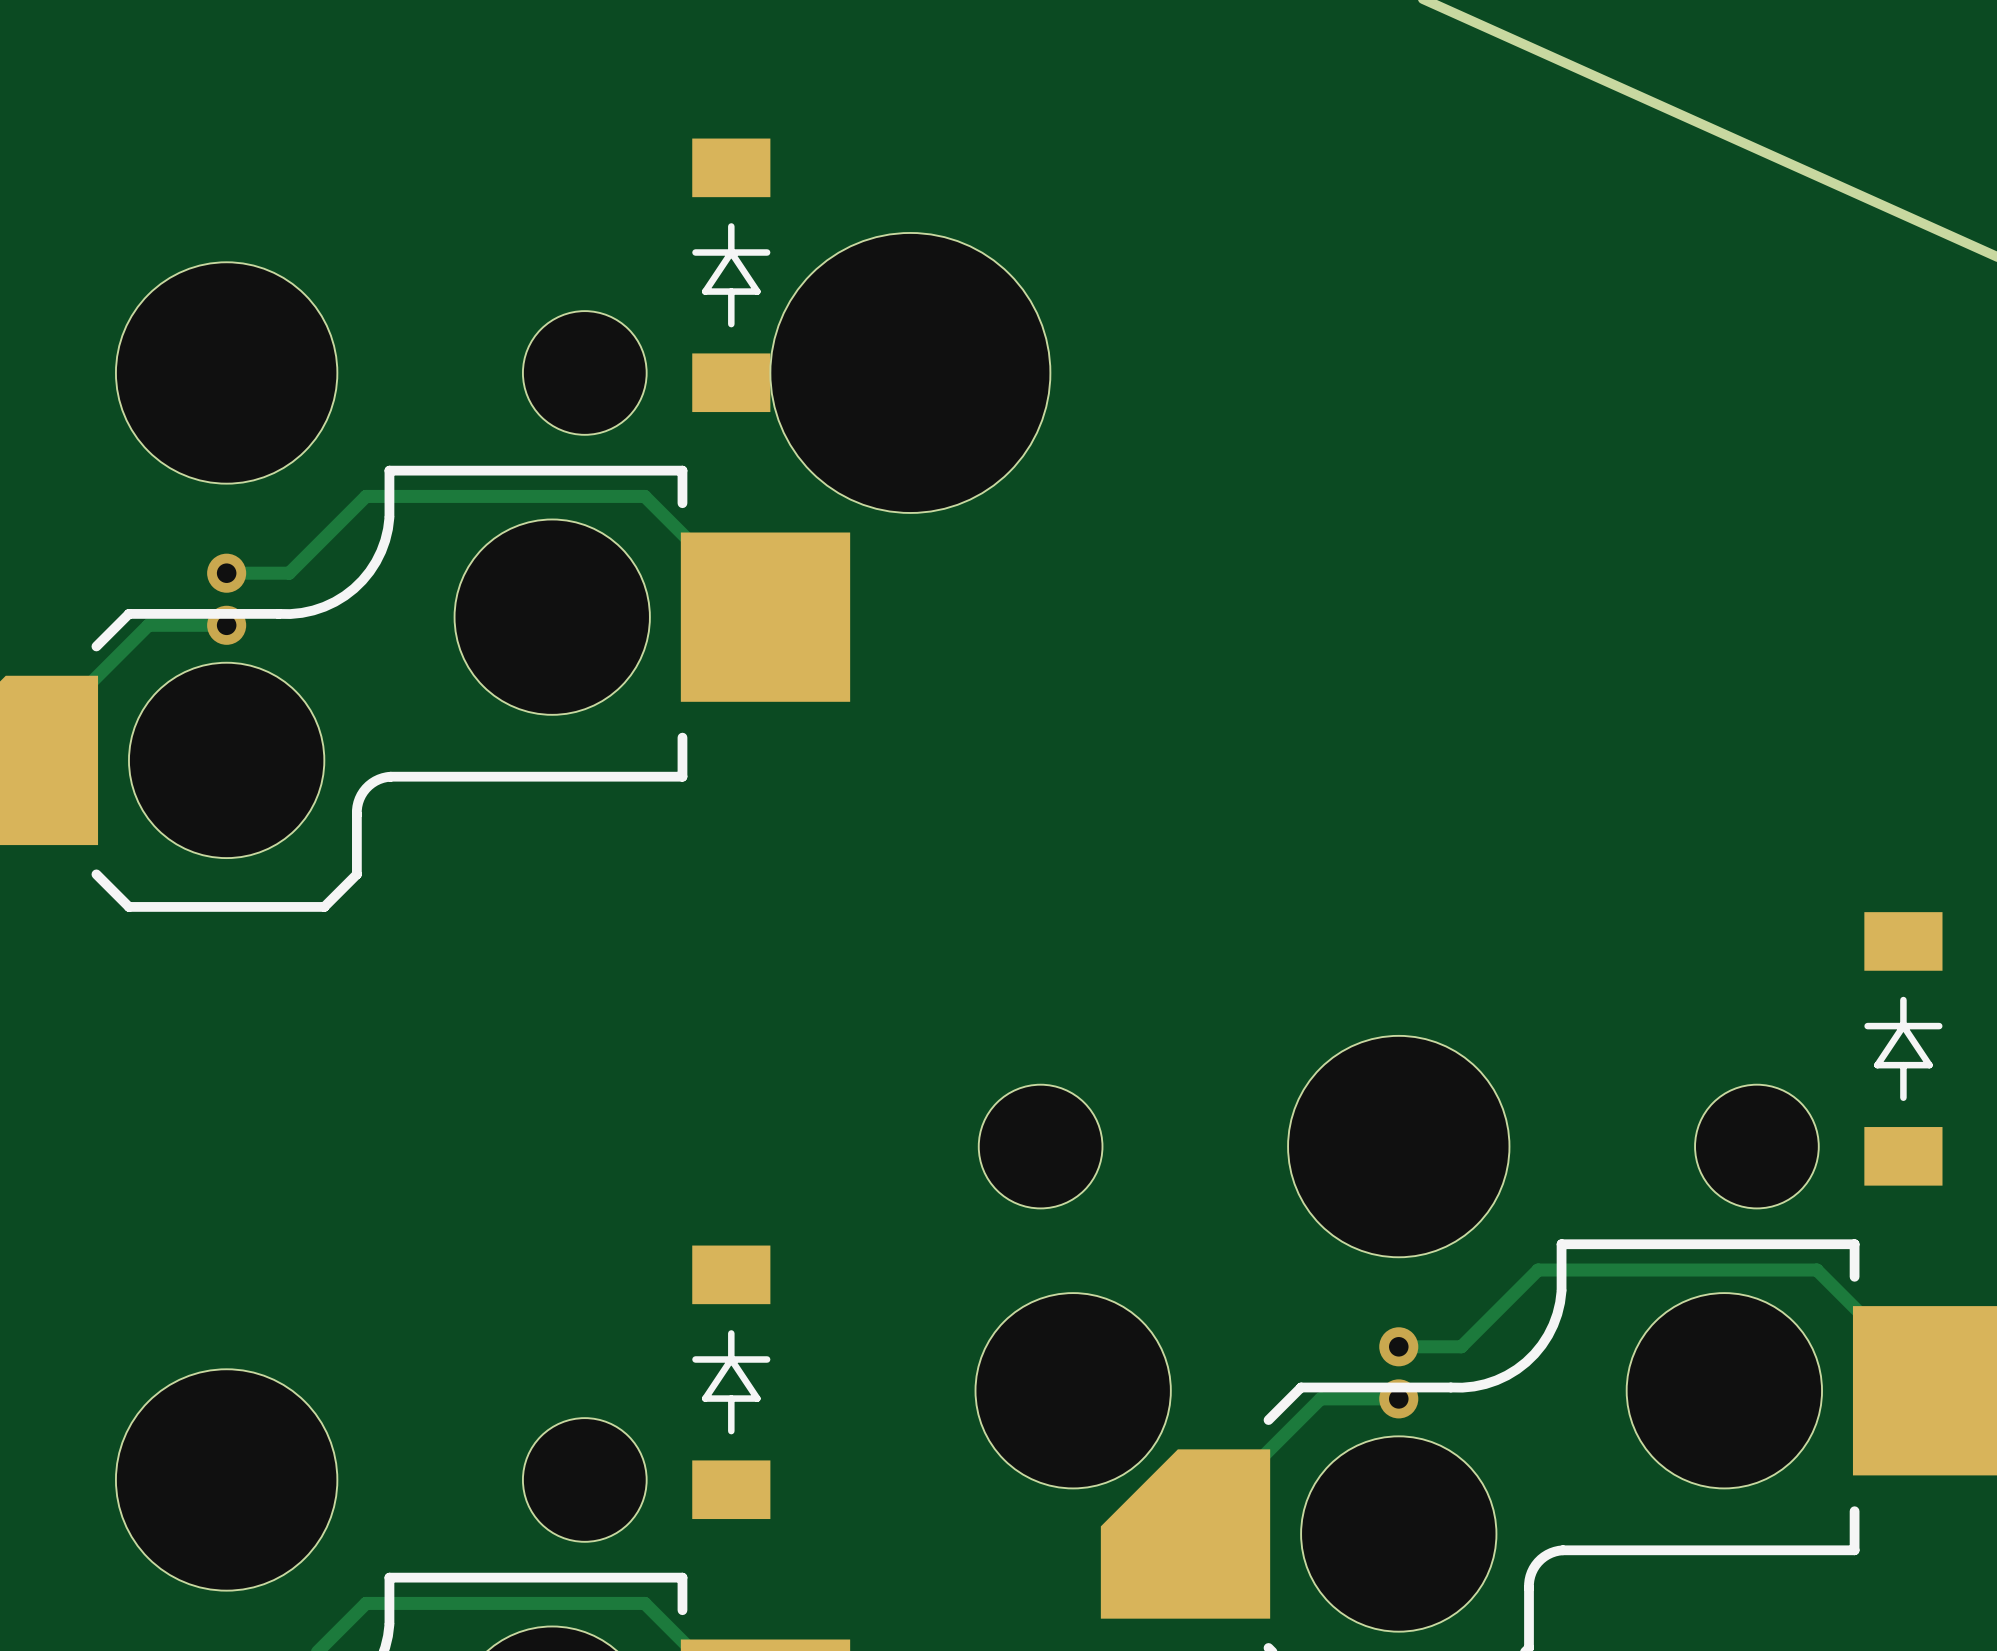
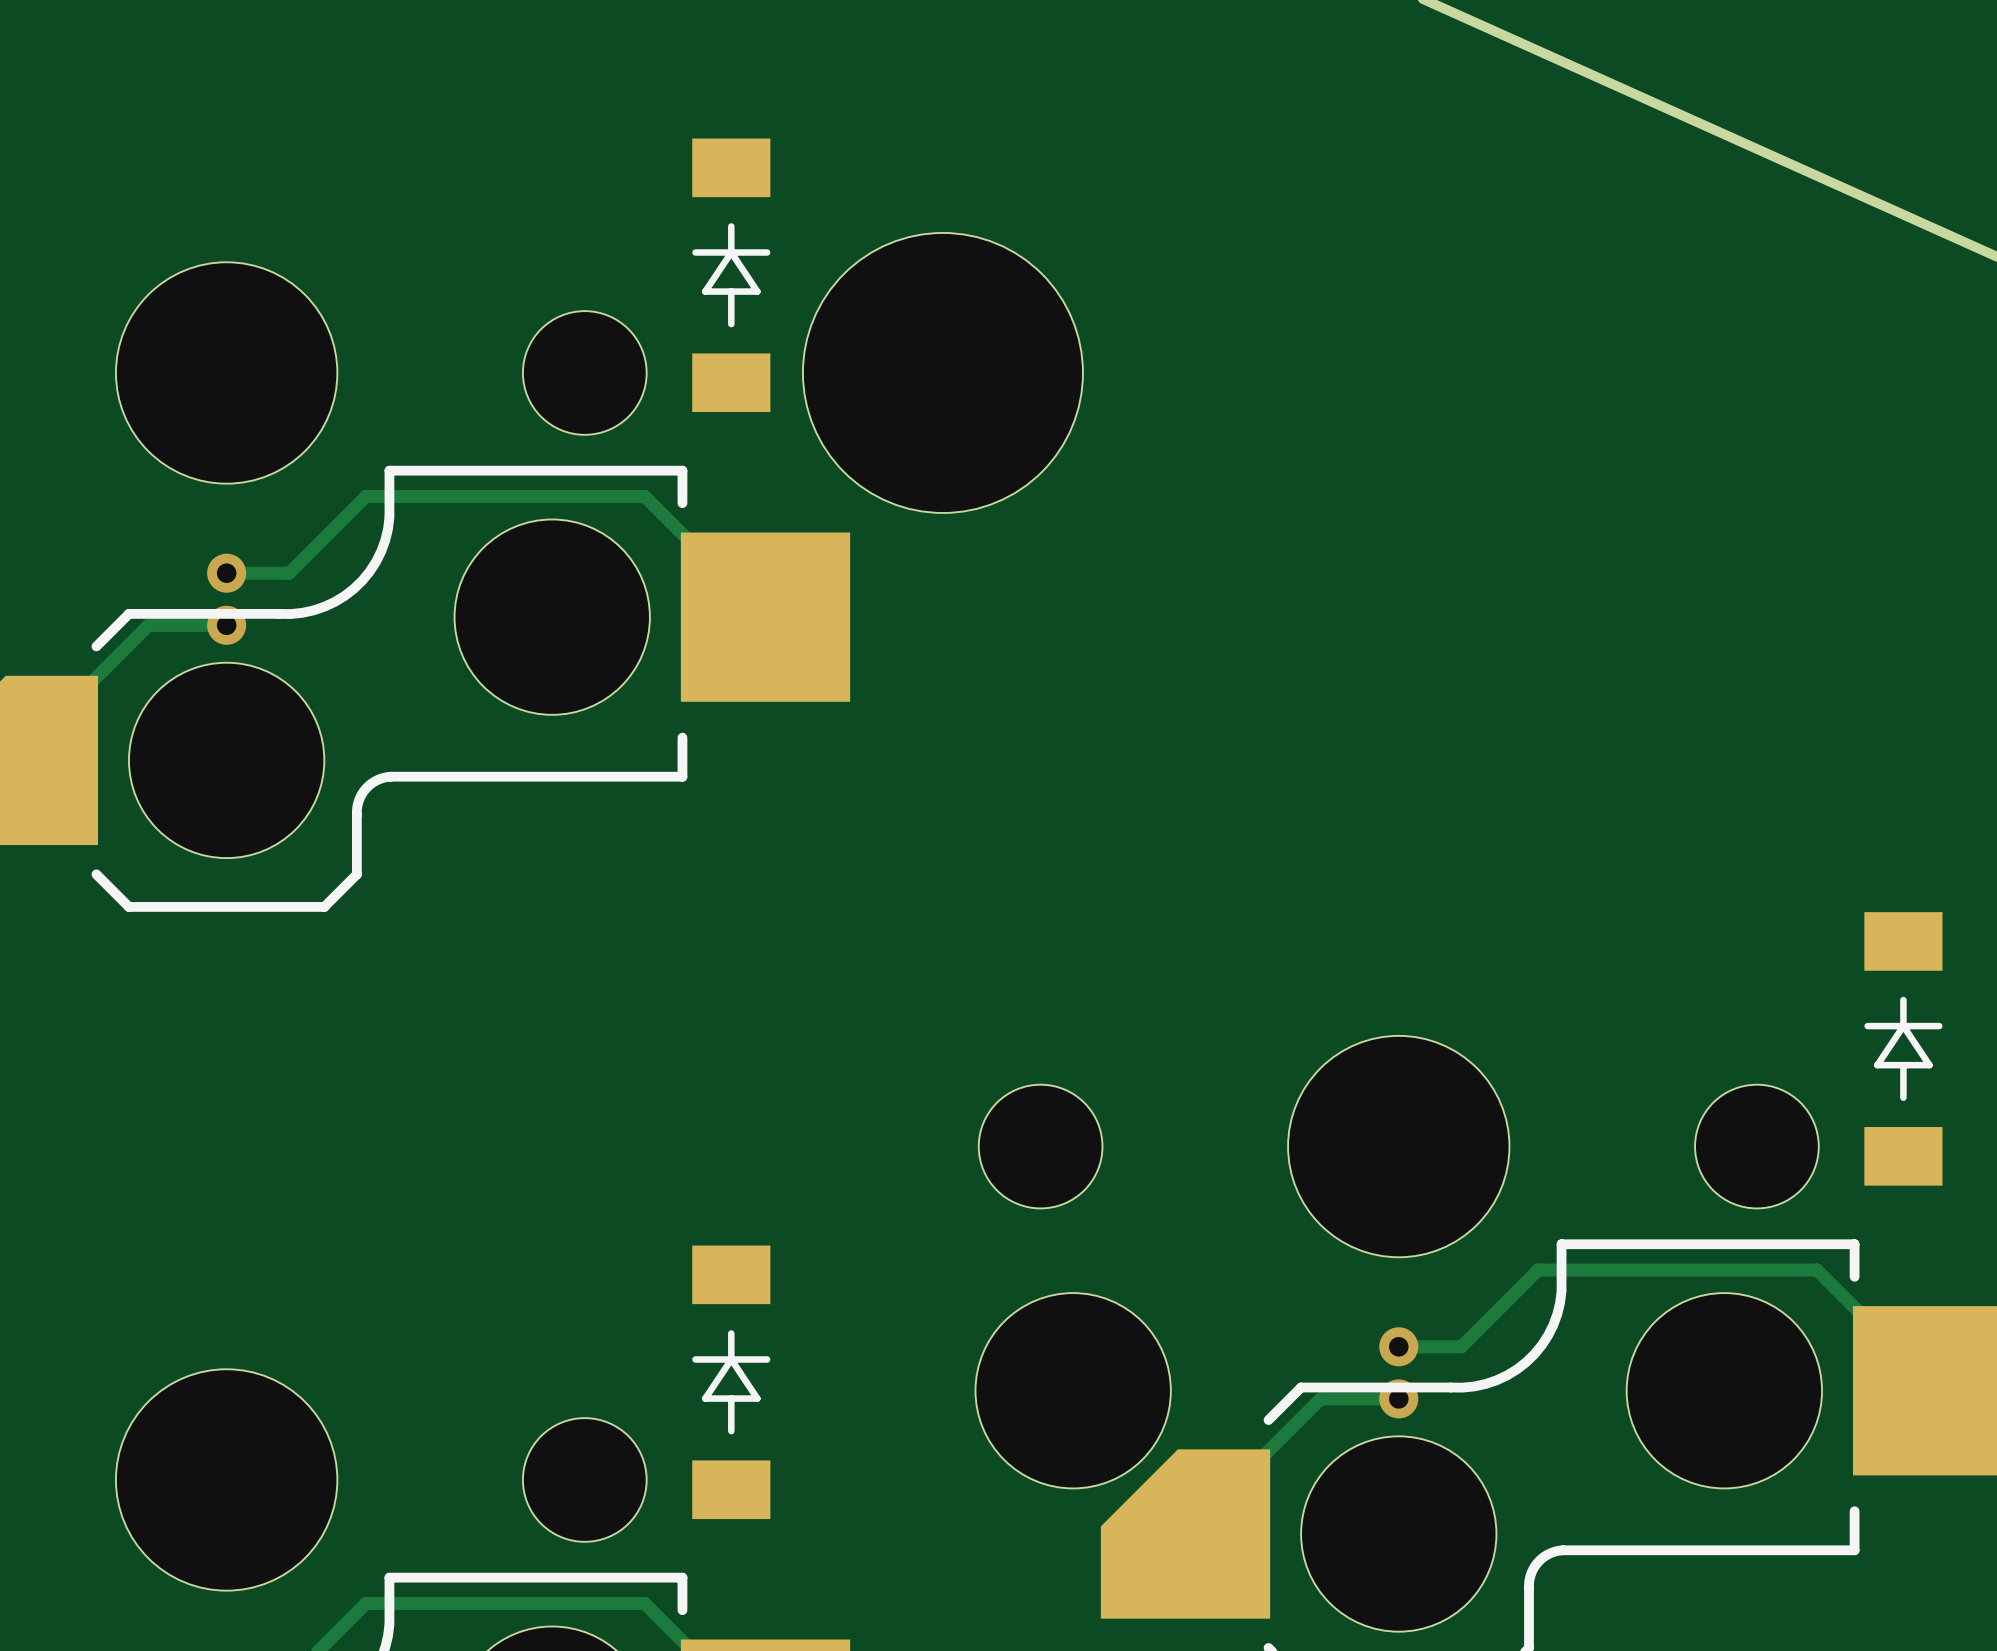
part position: (910, 372) -> (942, 372)

